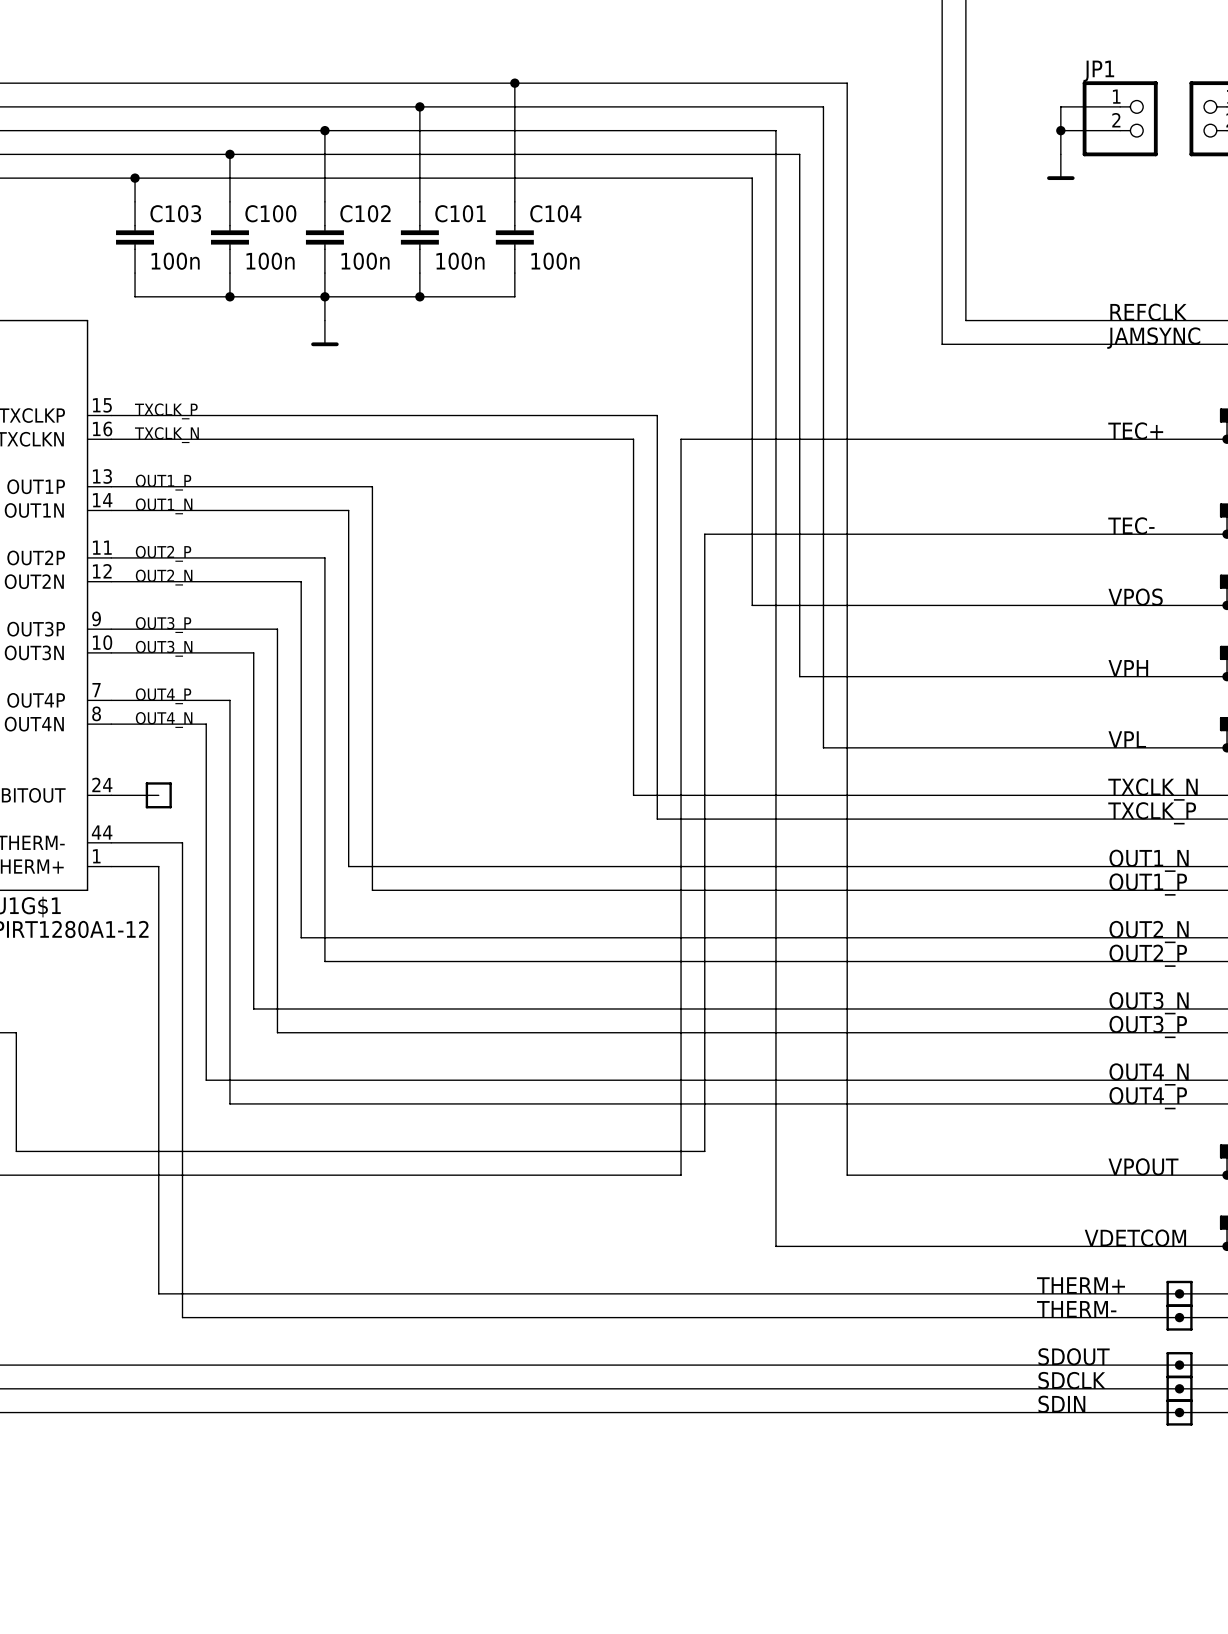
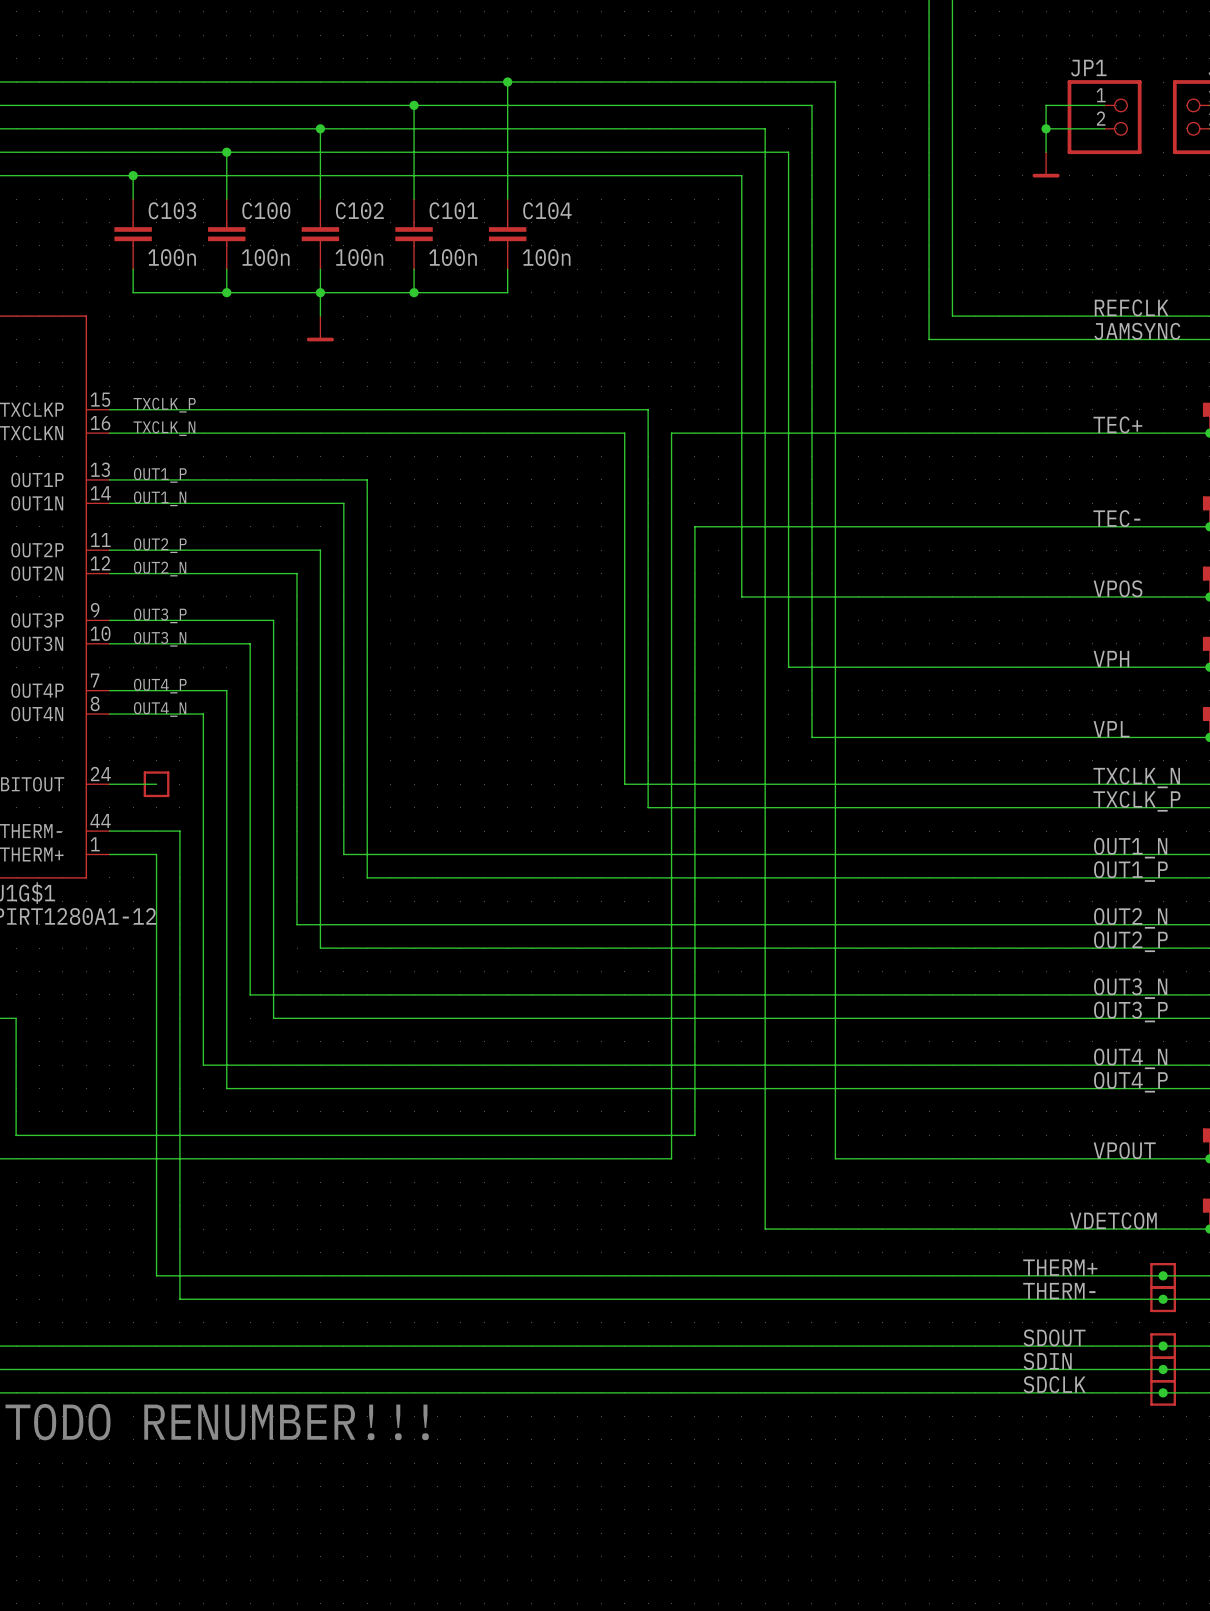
label: SDCLK (1072, 1380) -> SDIN (1047, 1361)
label: SDIN (1061, 1404) -> SDCLK (1054, 1384)
text: none -> TODO RENUMBER!!! (217, 1422)

